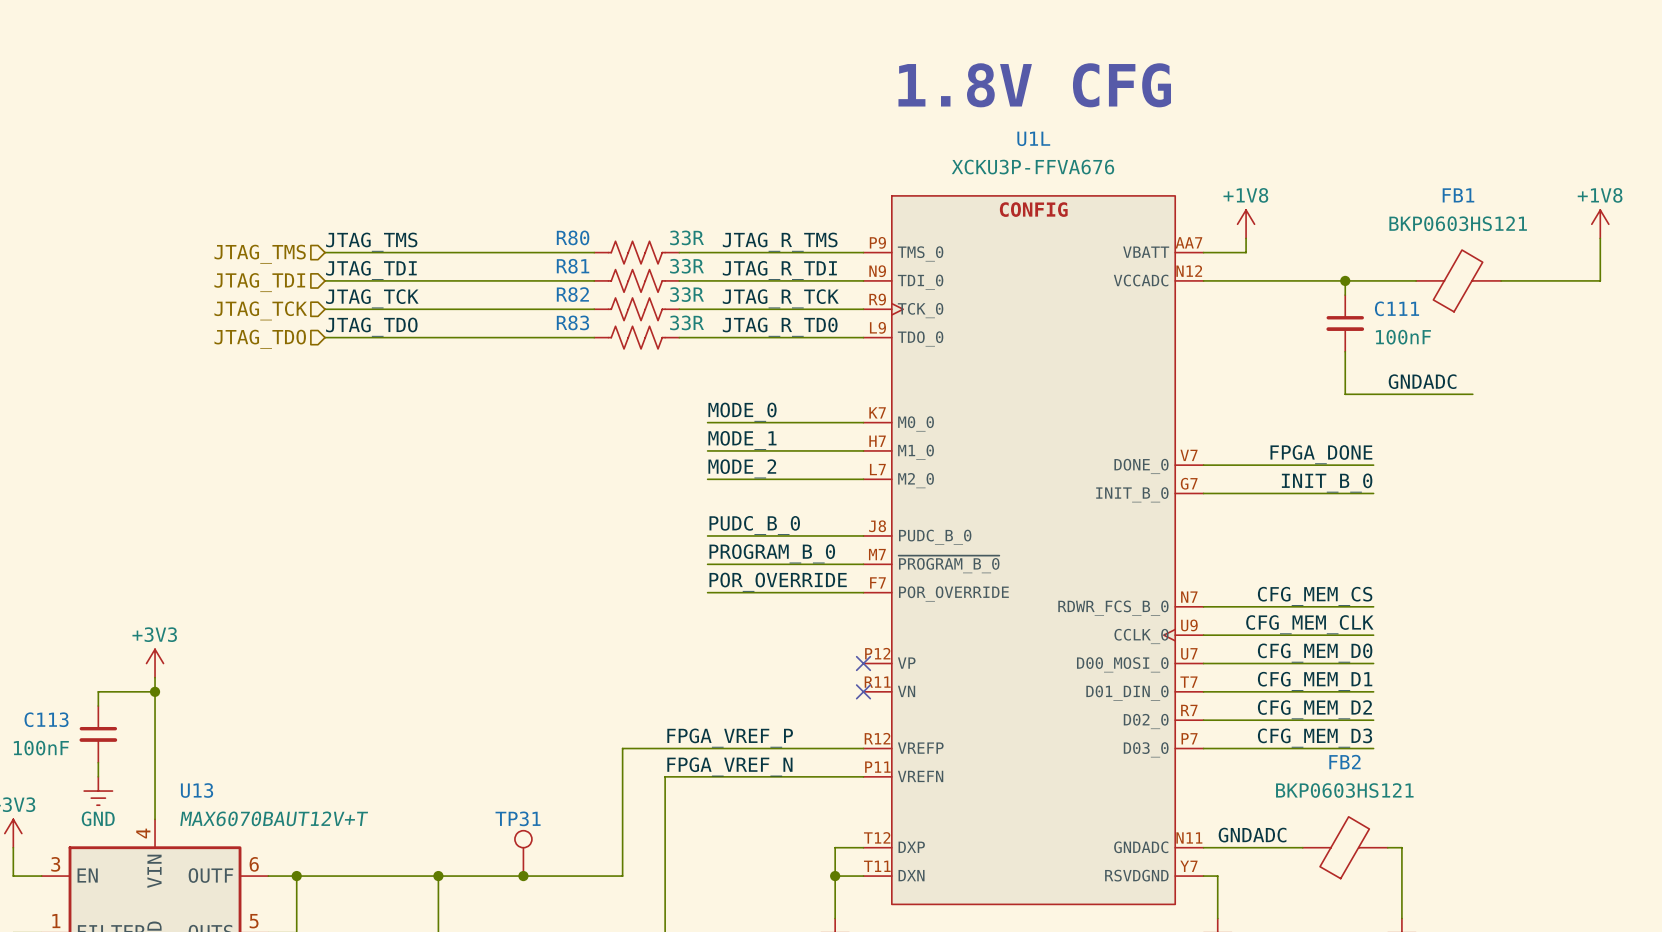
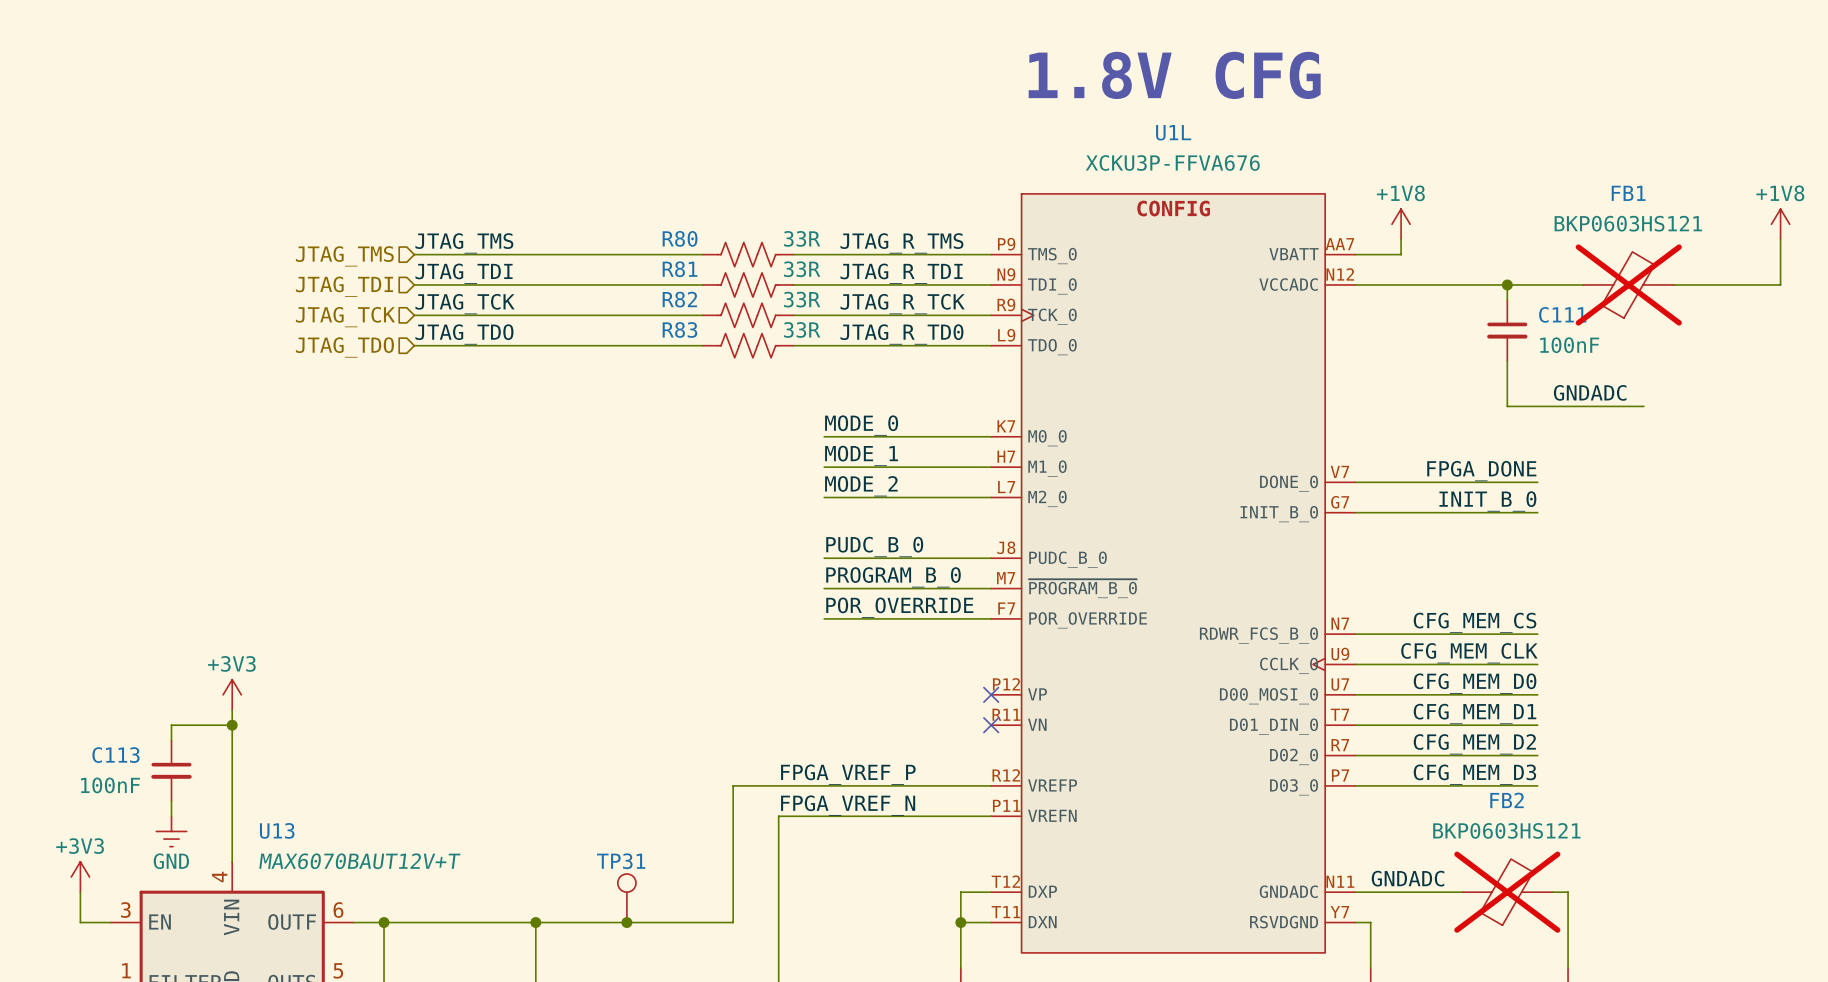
FB1 do-not-place cross: none -> (1628, 284)
FB2 do-not-place cross: none -> (1507, 892)

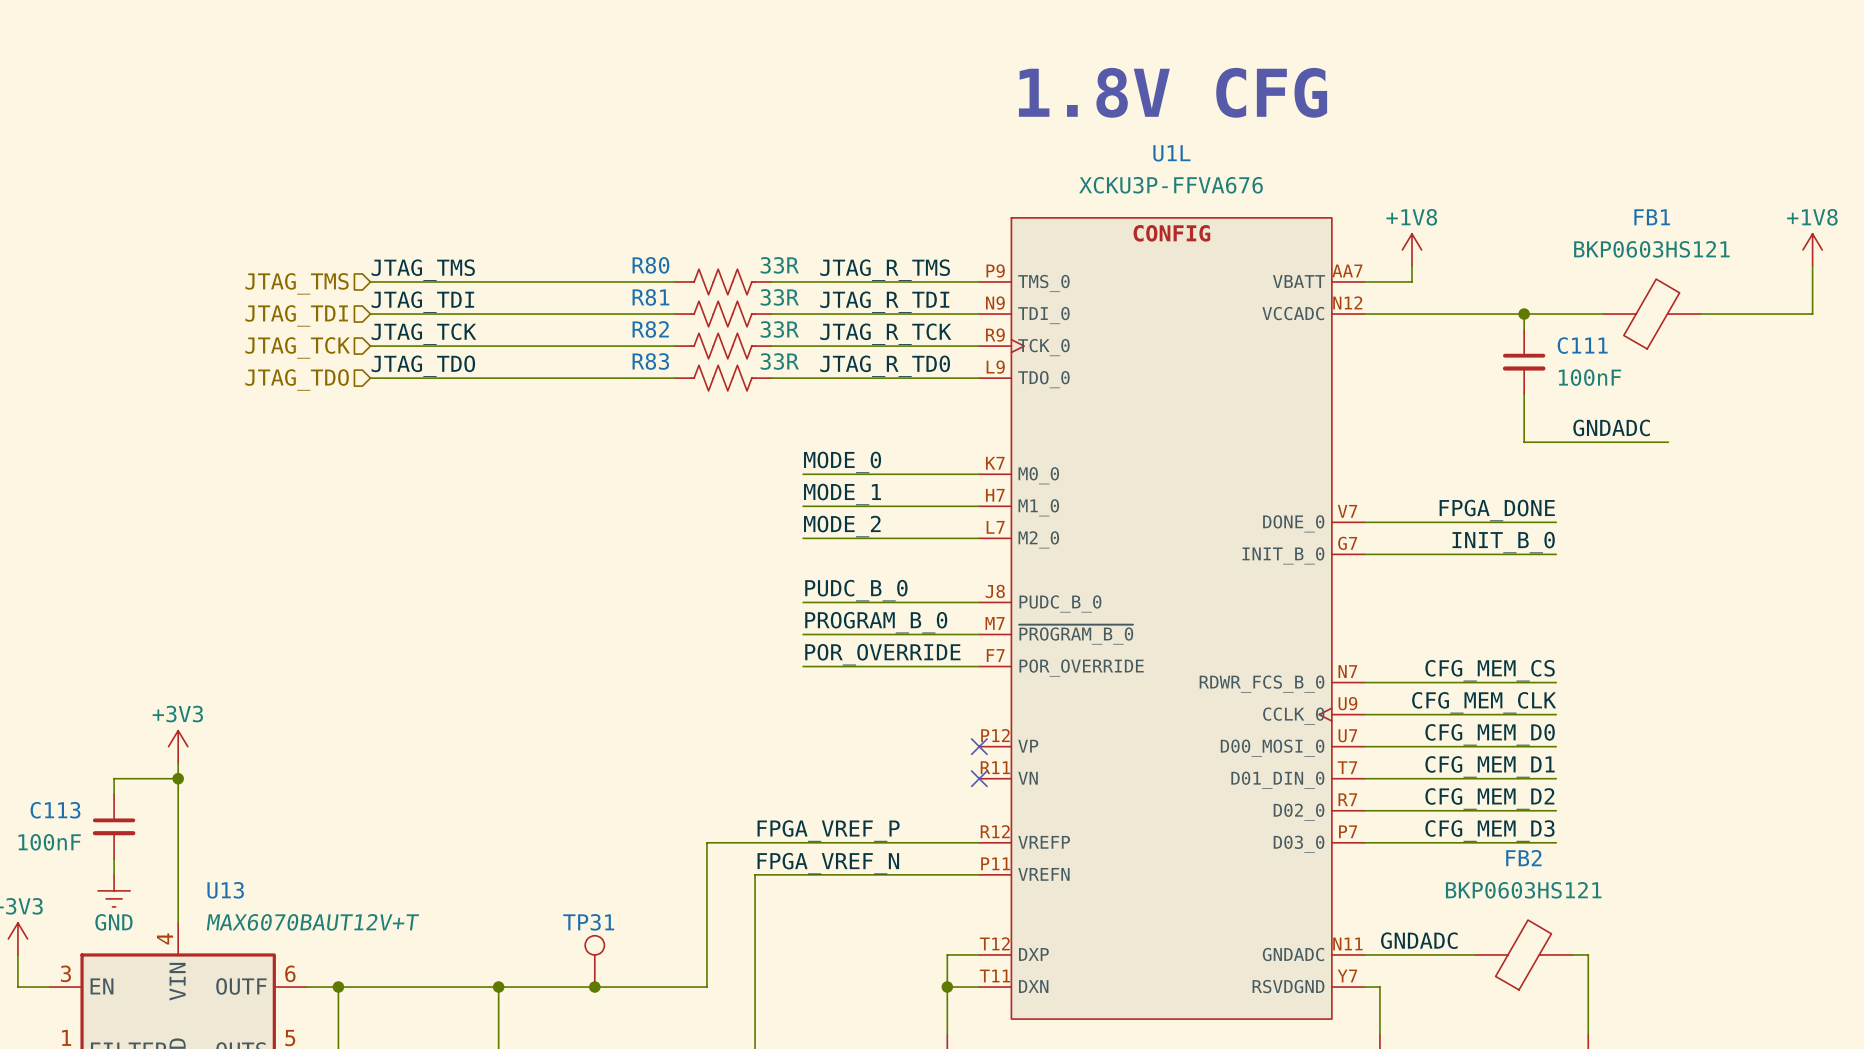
FB1 do-not-place cross: (1628, 284) -> none
FB2 do-not-place cross: (1507, 892) -> none

